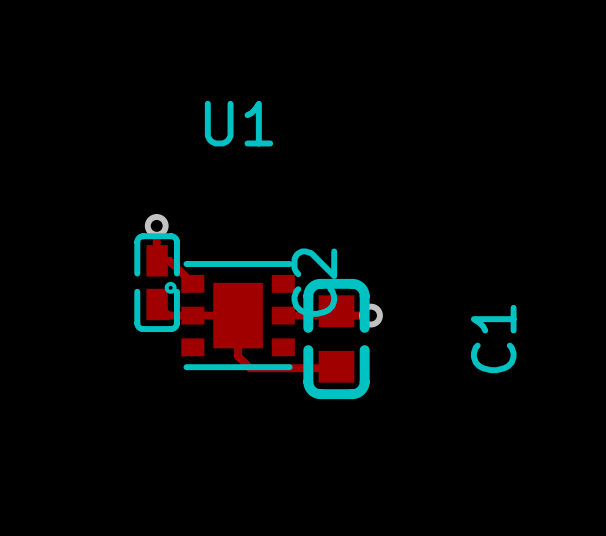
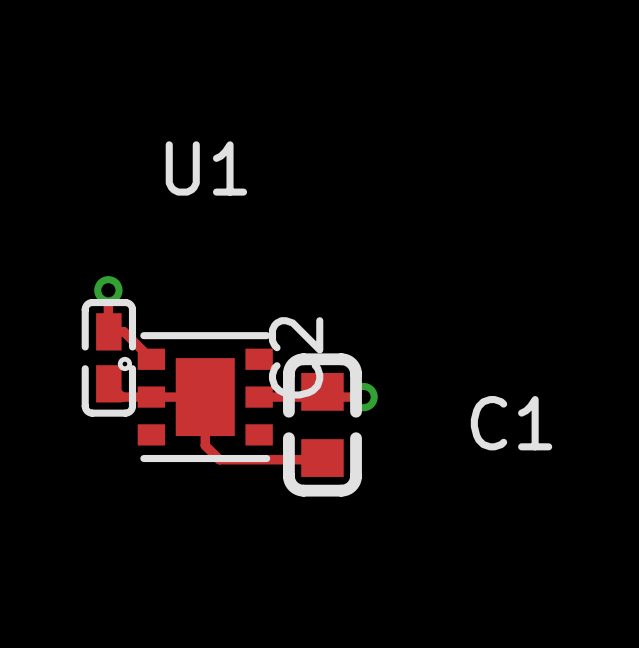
C1 name rotation: 0° (493, 338) -> 90° clockwise (511, 423)

